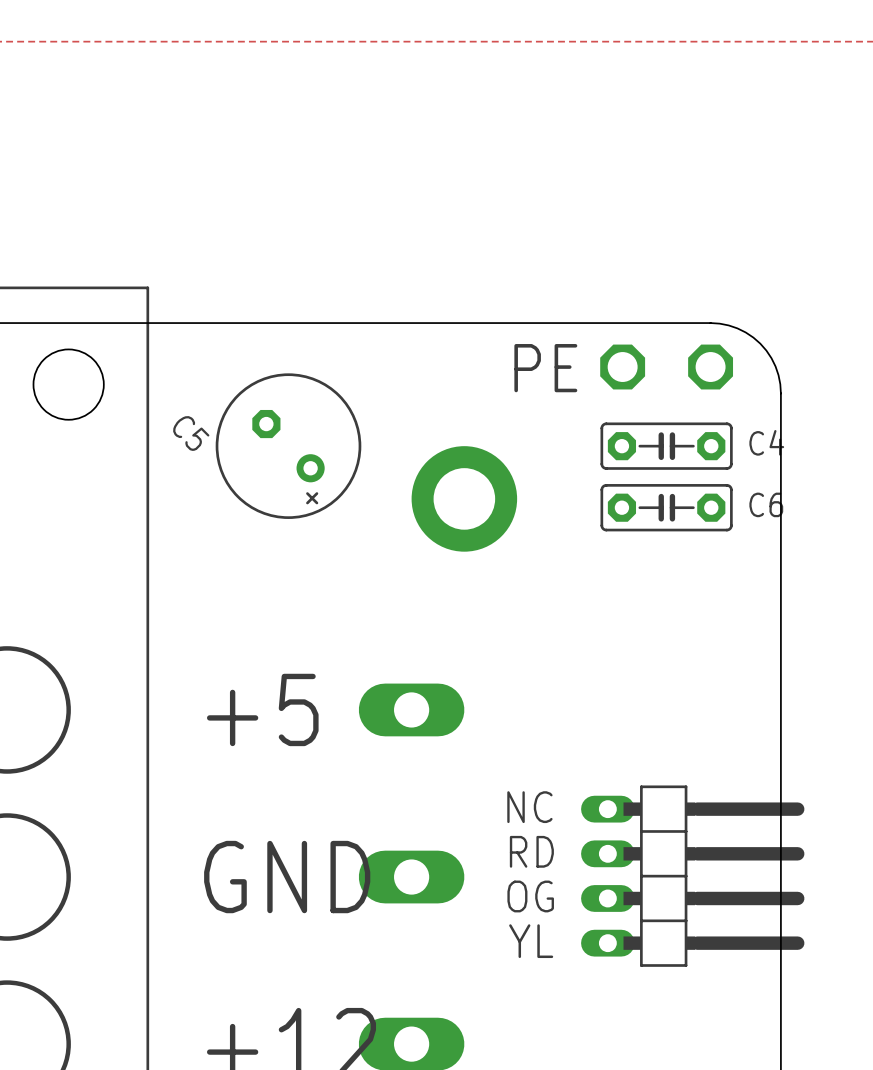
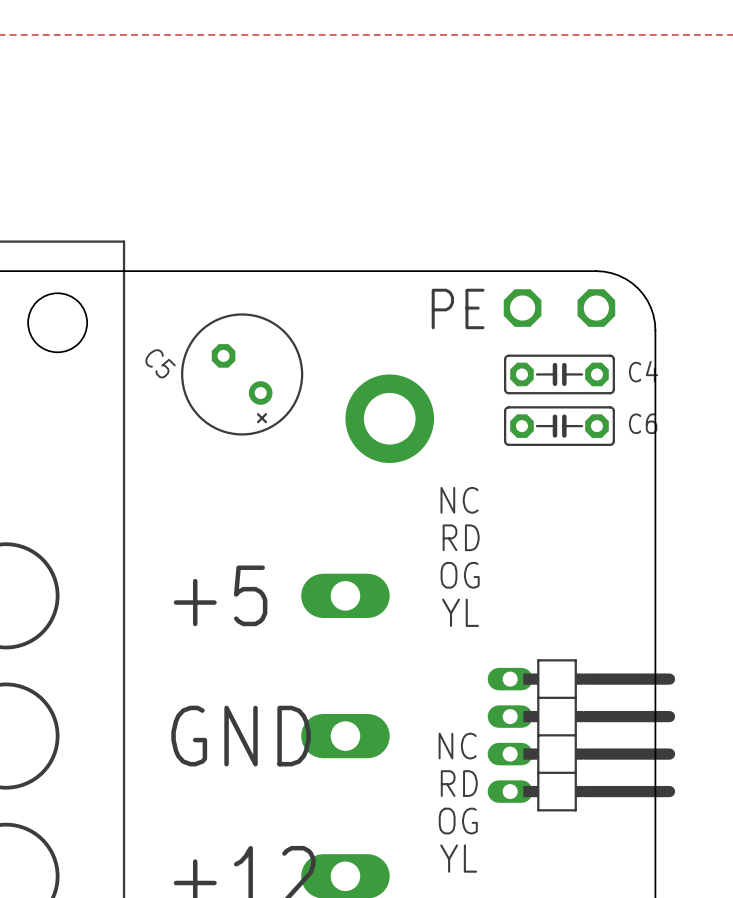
text: none -> OG (460, 575)
text: none -> YL (460, 612)
text position: NC (529, 807) -> NC (459, 500)
text position: RD (531, 851) -> RD (461, 537)
text: OG (530, 896) -> NC (457, 746)
text: YL (531, 941) -> RD (459, 783)
text: none -> OG (458, 821)
text: none -> YL (458, 858)

